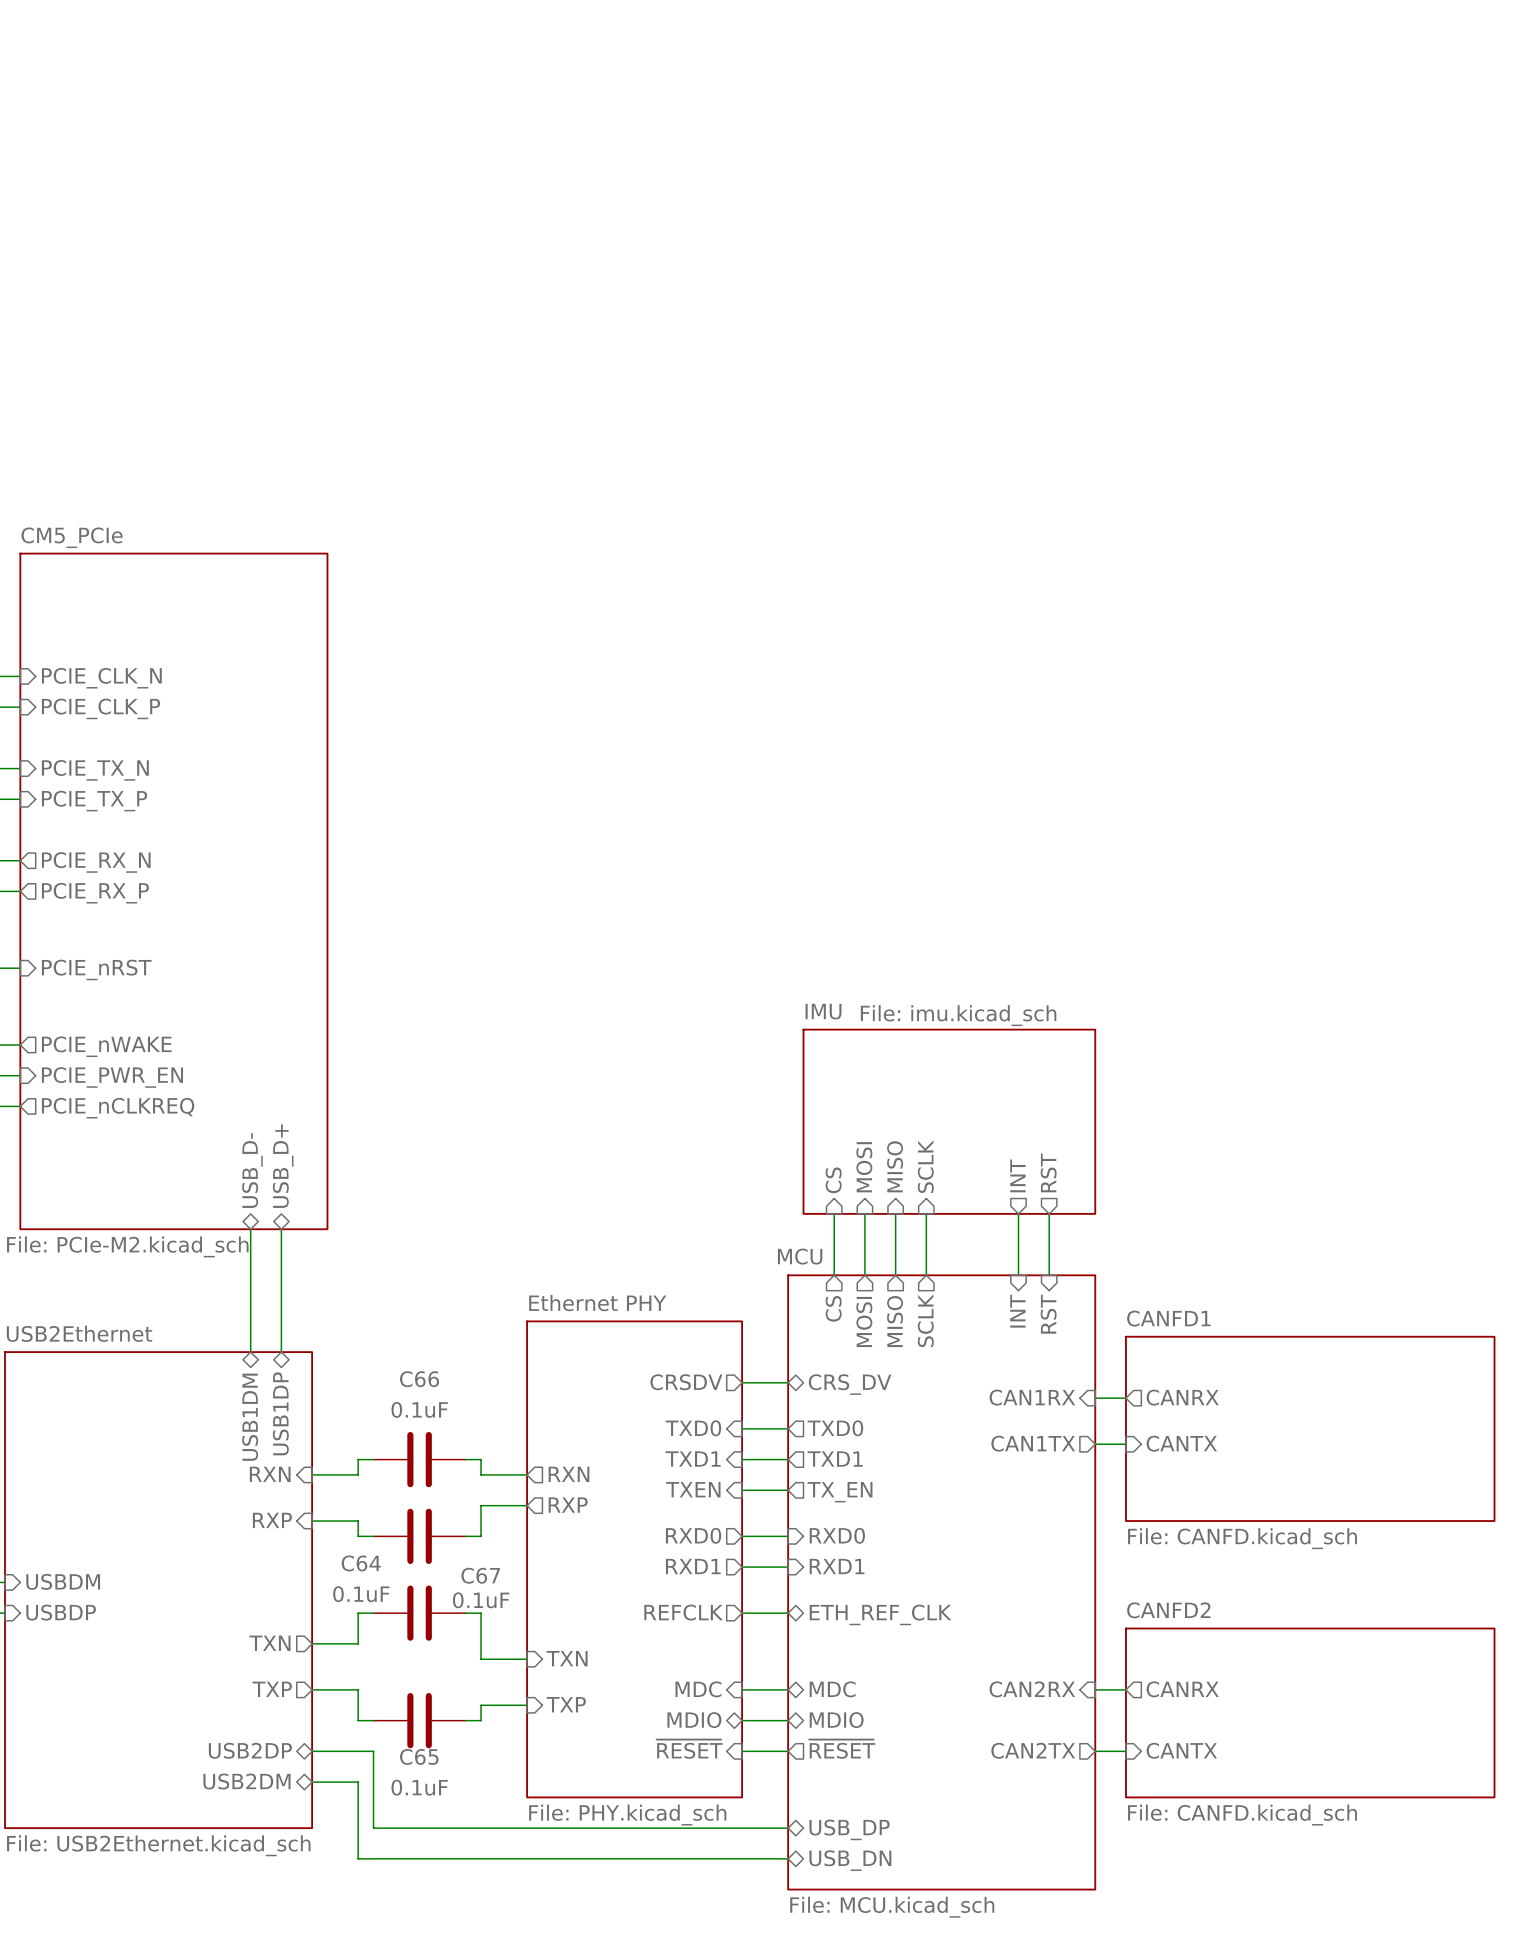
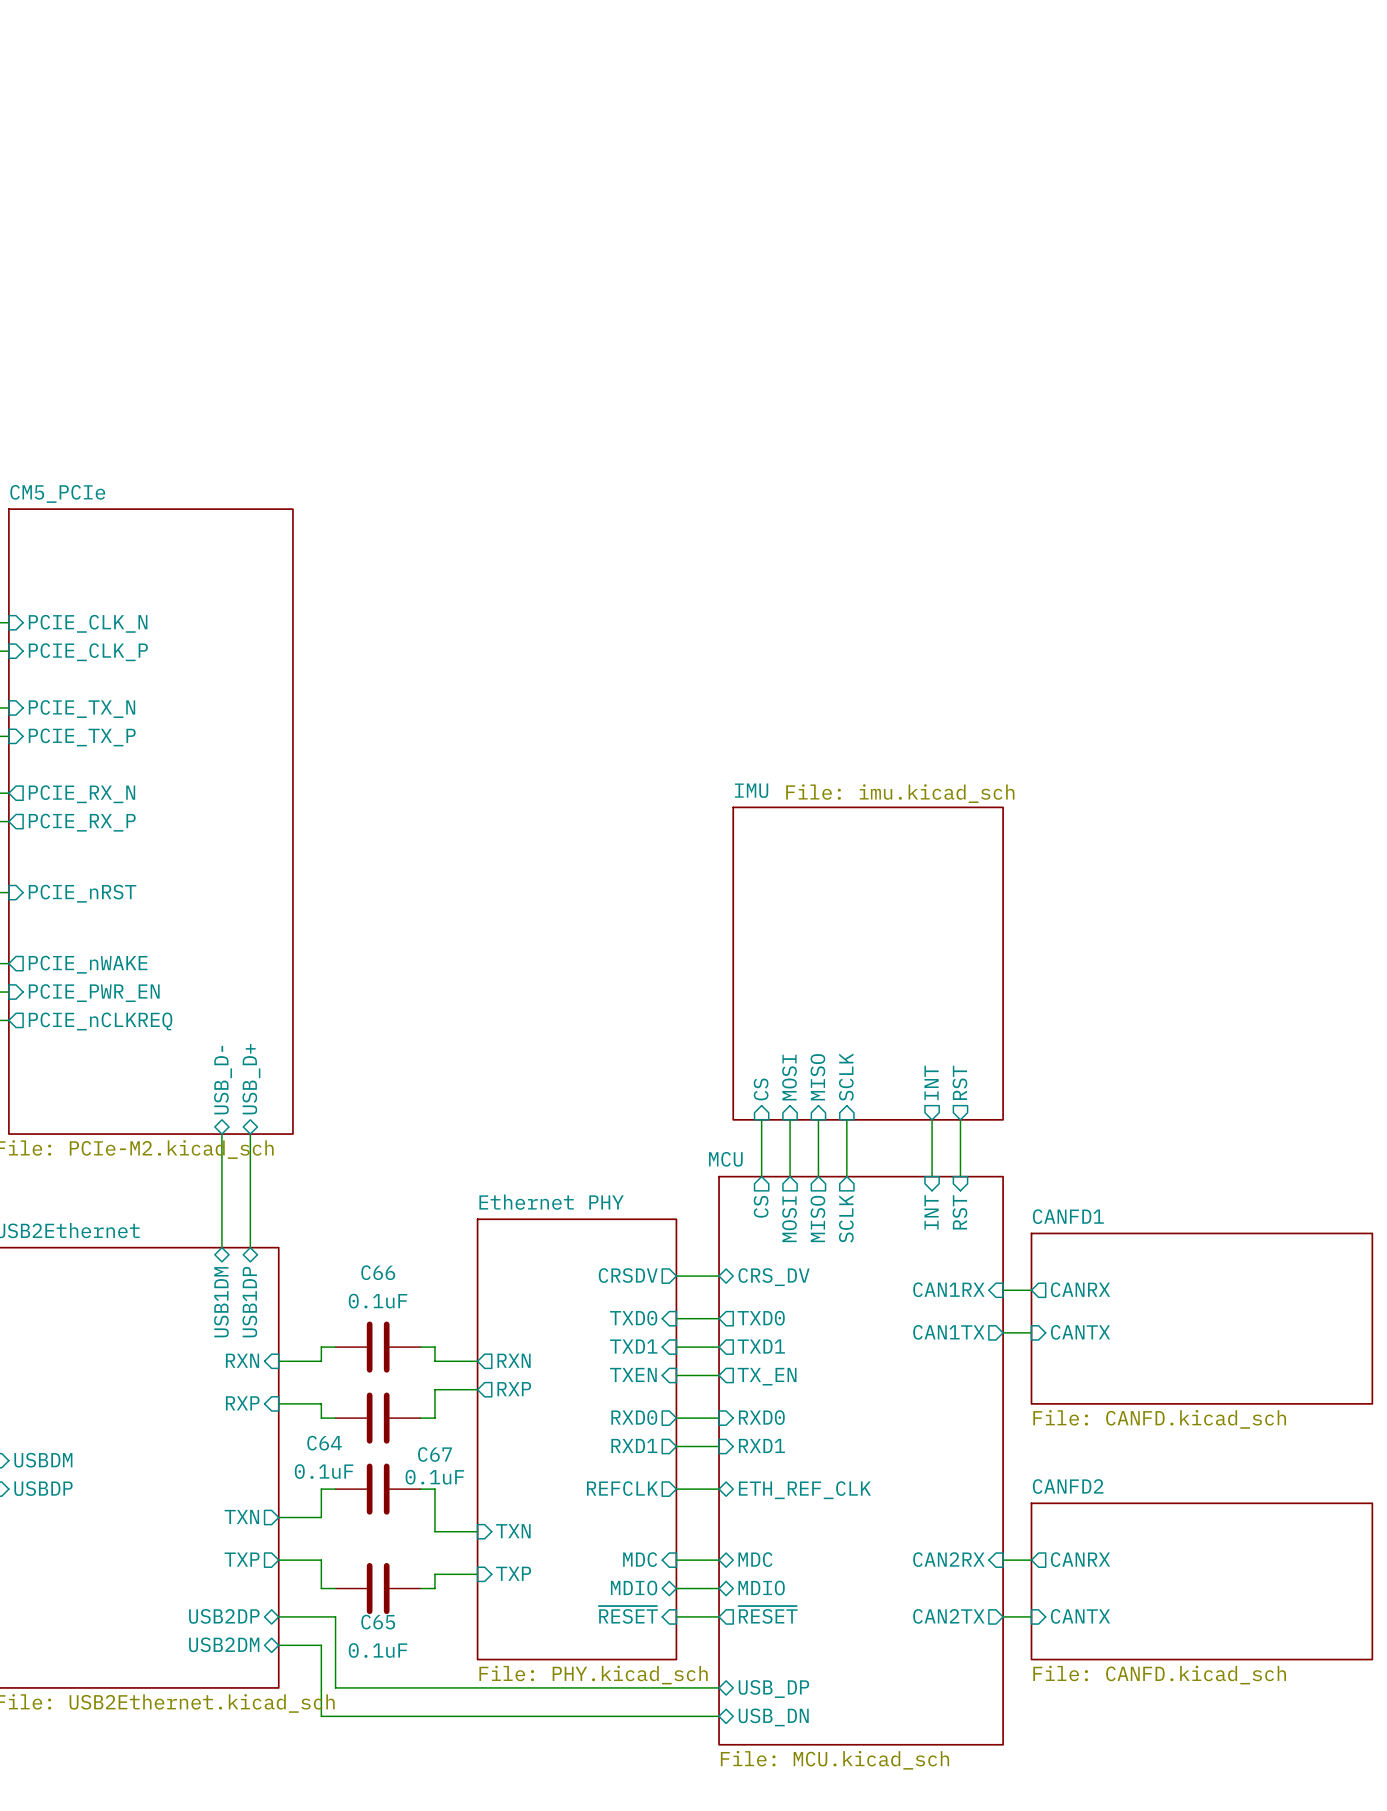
sheet IMU: none -> File: imu.kicad_sch (868, 963)
sheet IMU: File: imu.kicad_sch (949, 1121) -> none

